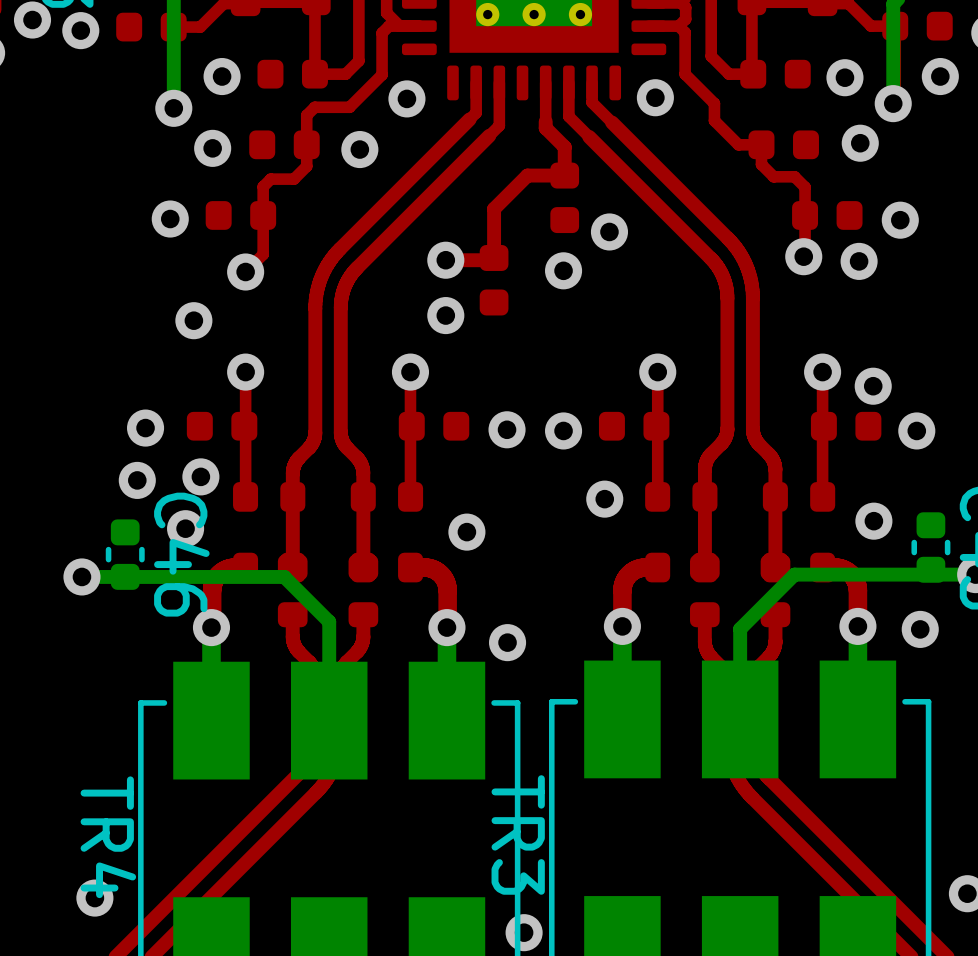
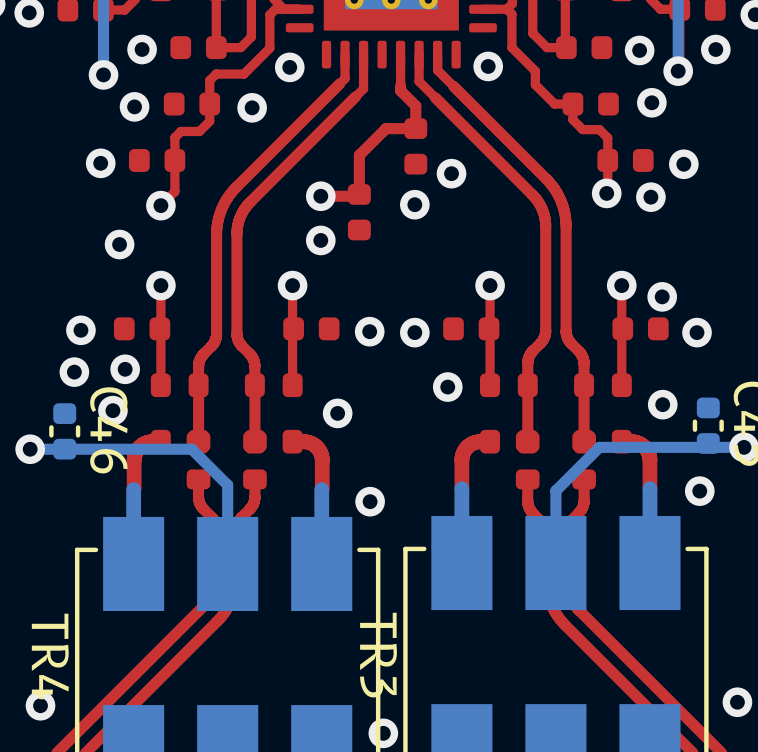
via: (622, 626) -> none
via: (857, 626) -> none
via: (211, 627) -> none
via: (446, 627) -> none

